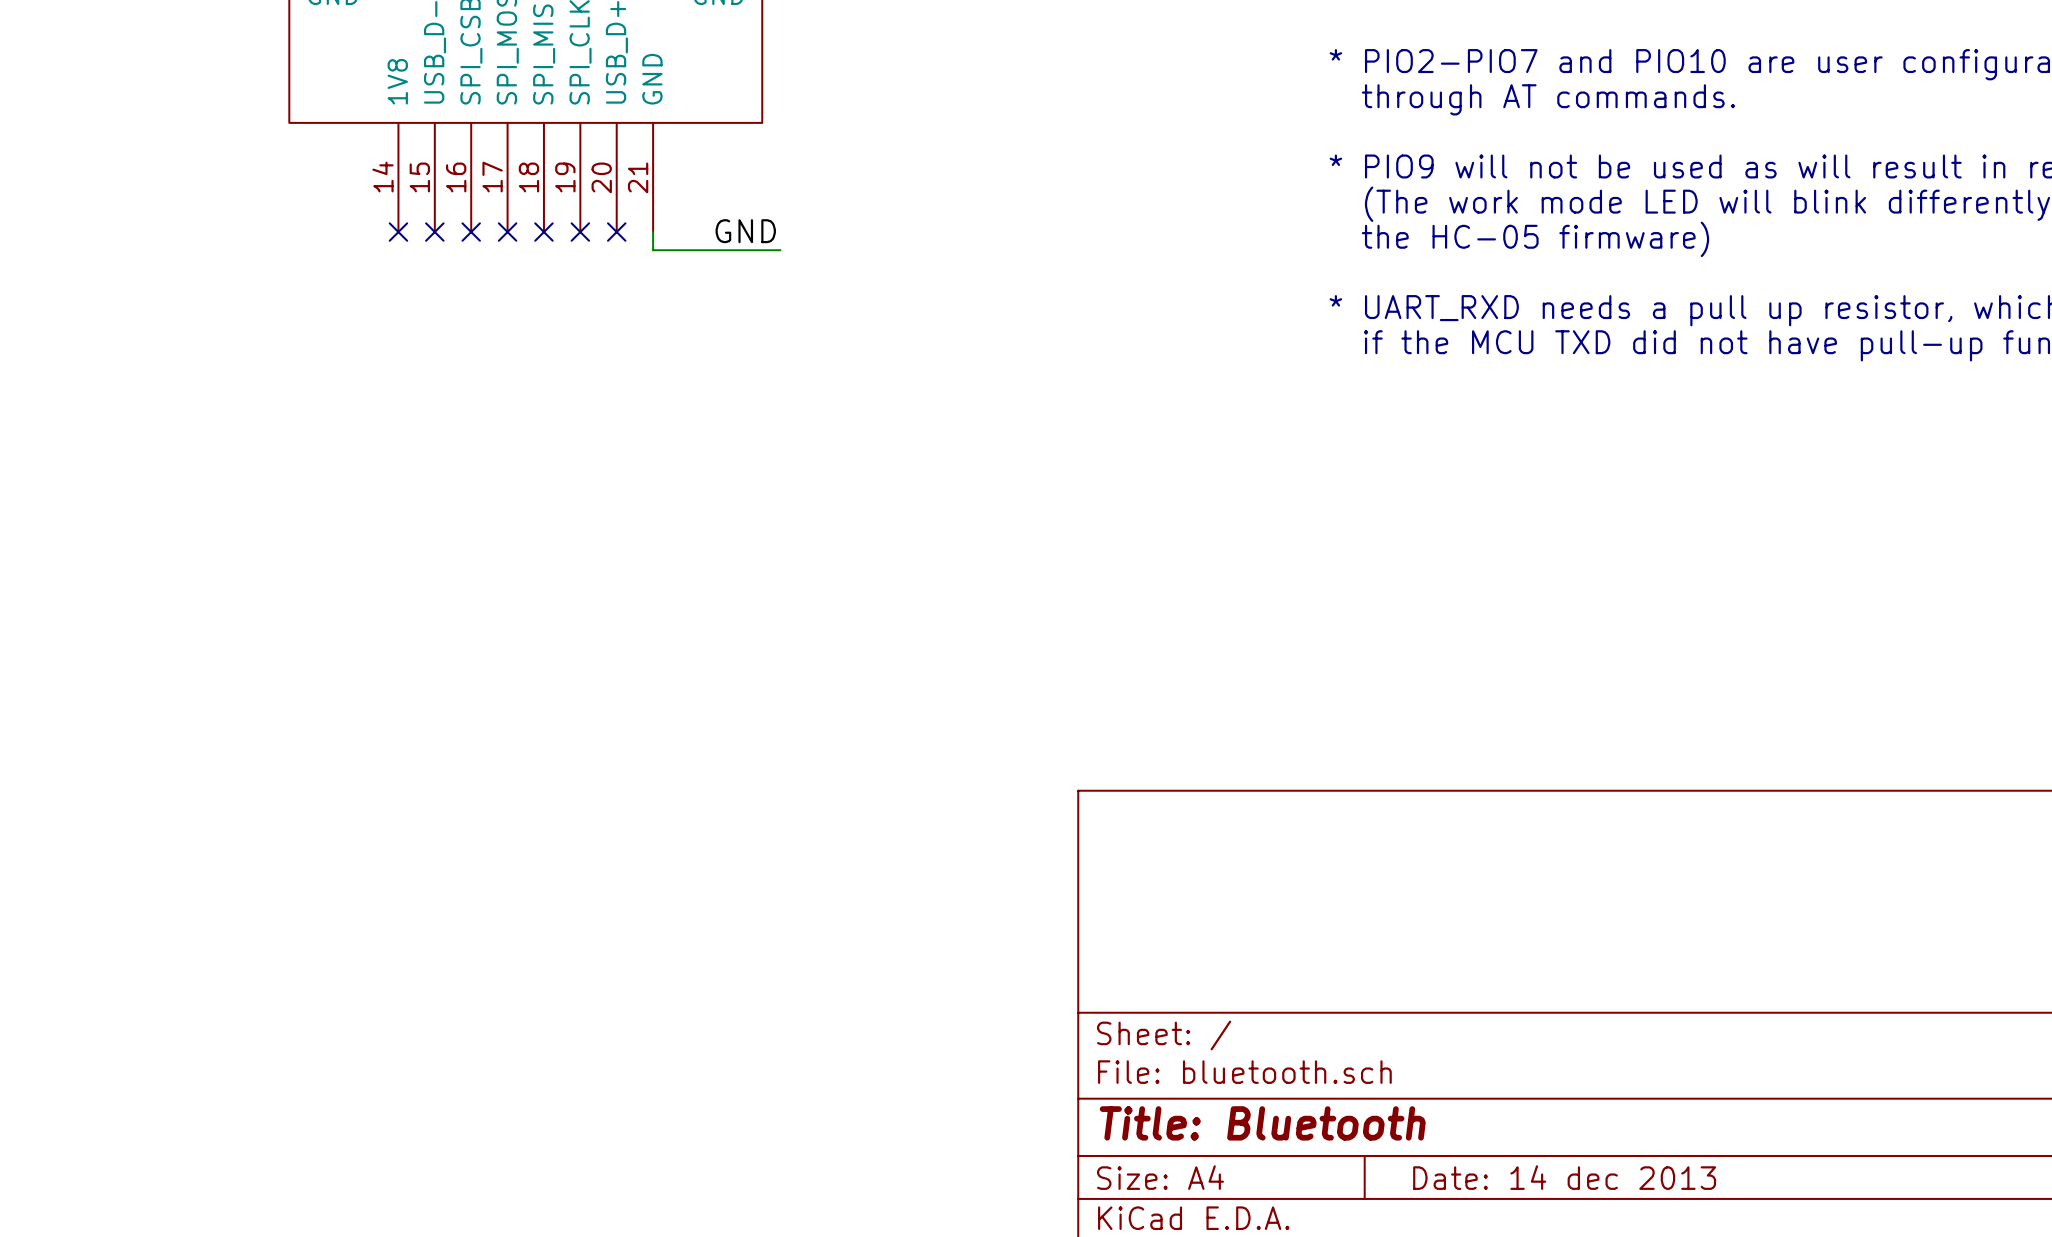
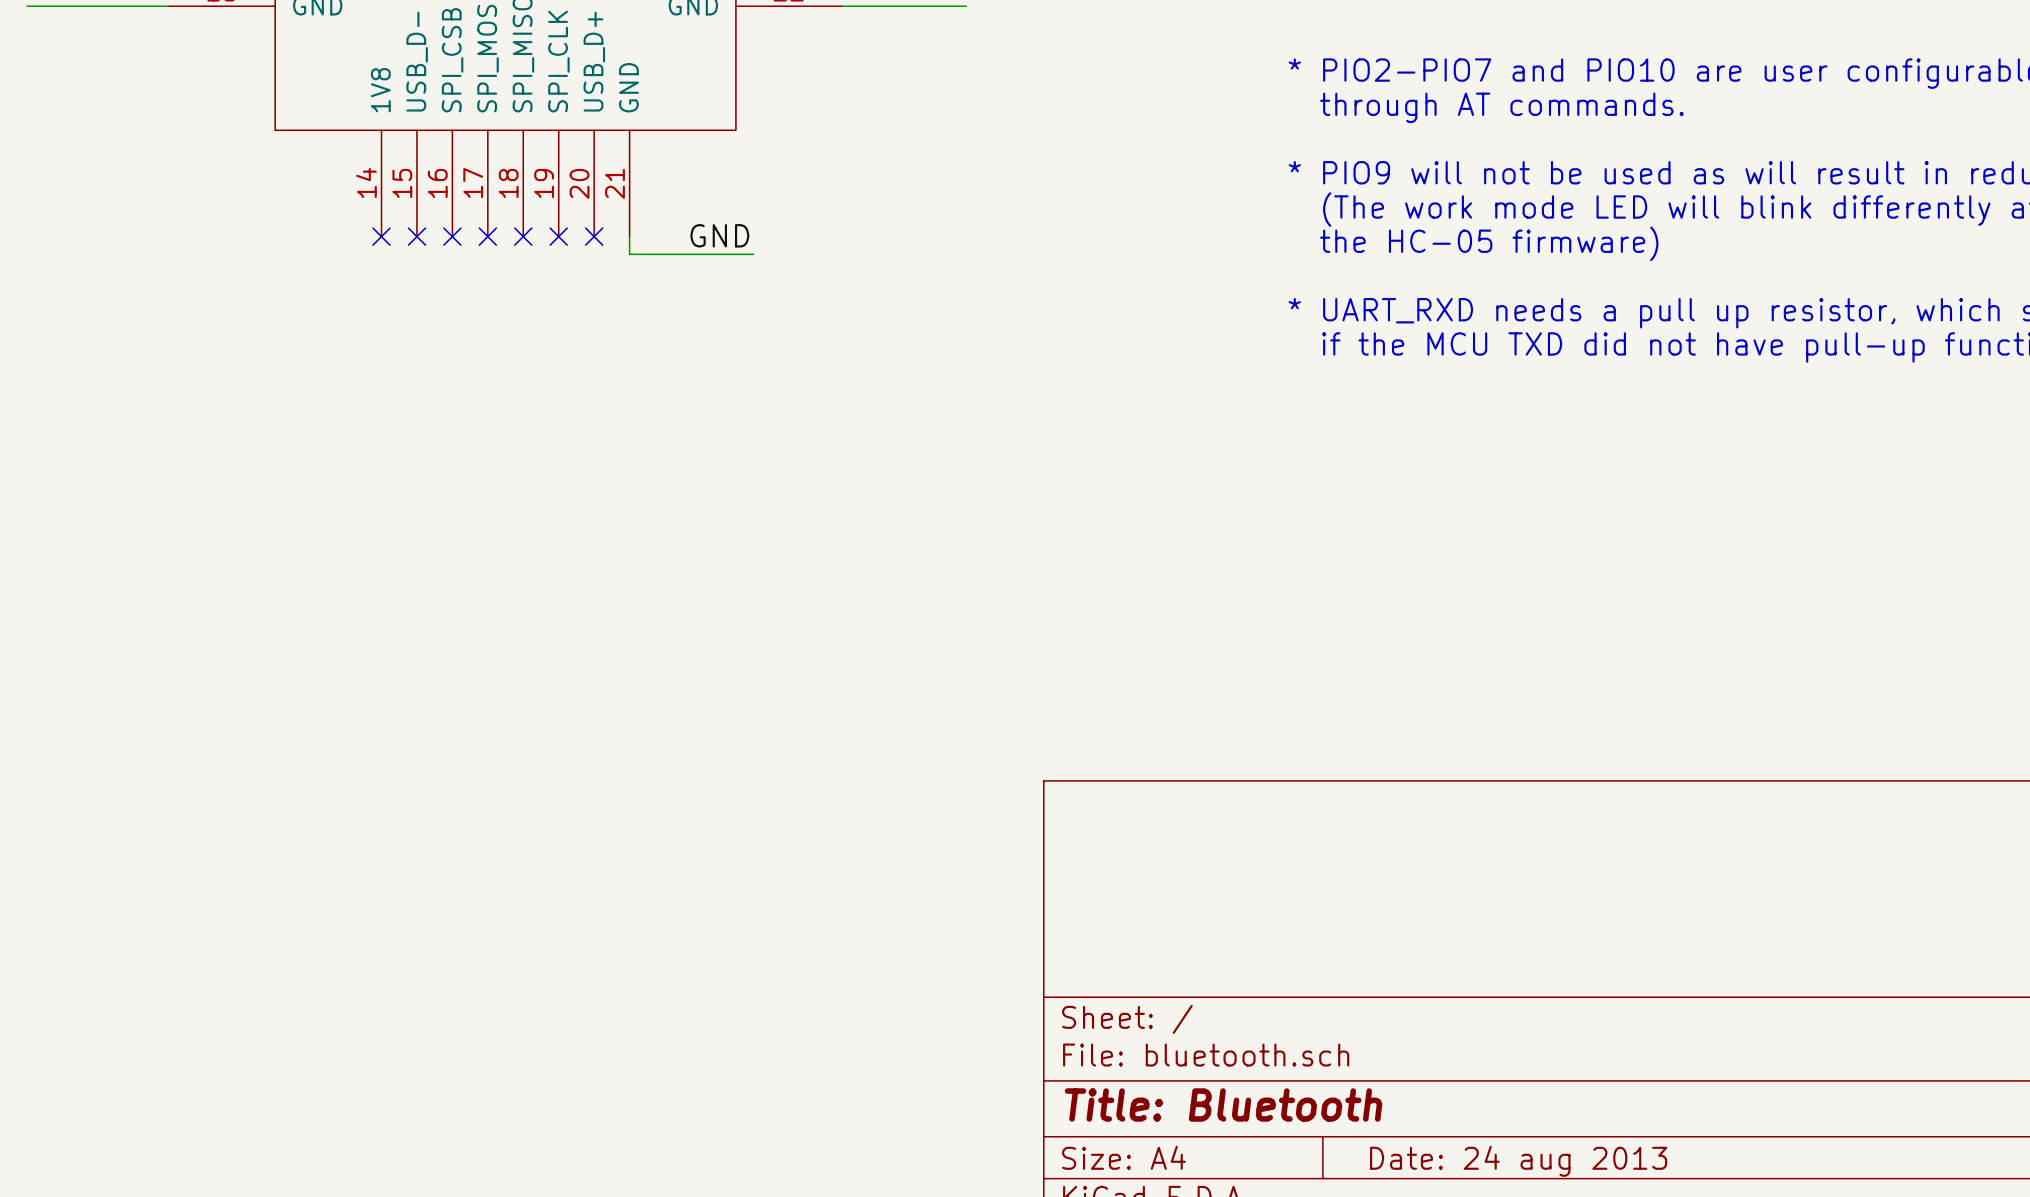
title block: Date: 14 dec 2013 (1564, 1177) -> Date: 24 aug 2013 (1518, 1161)

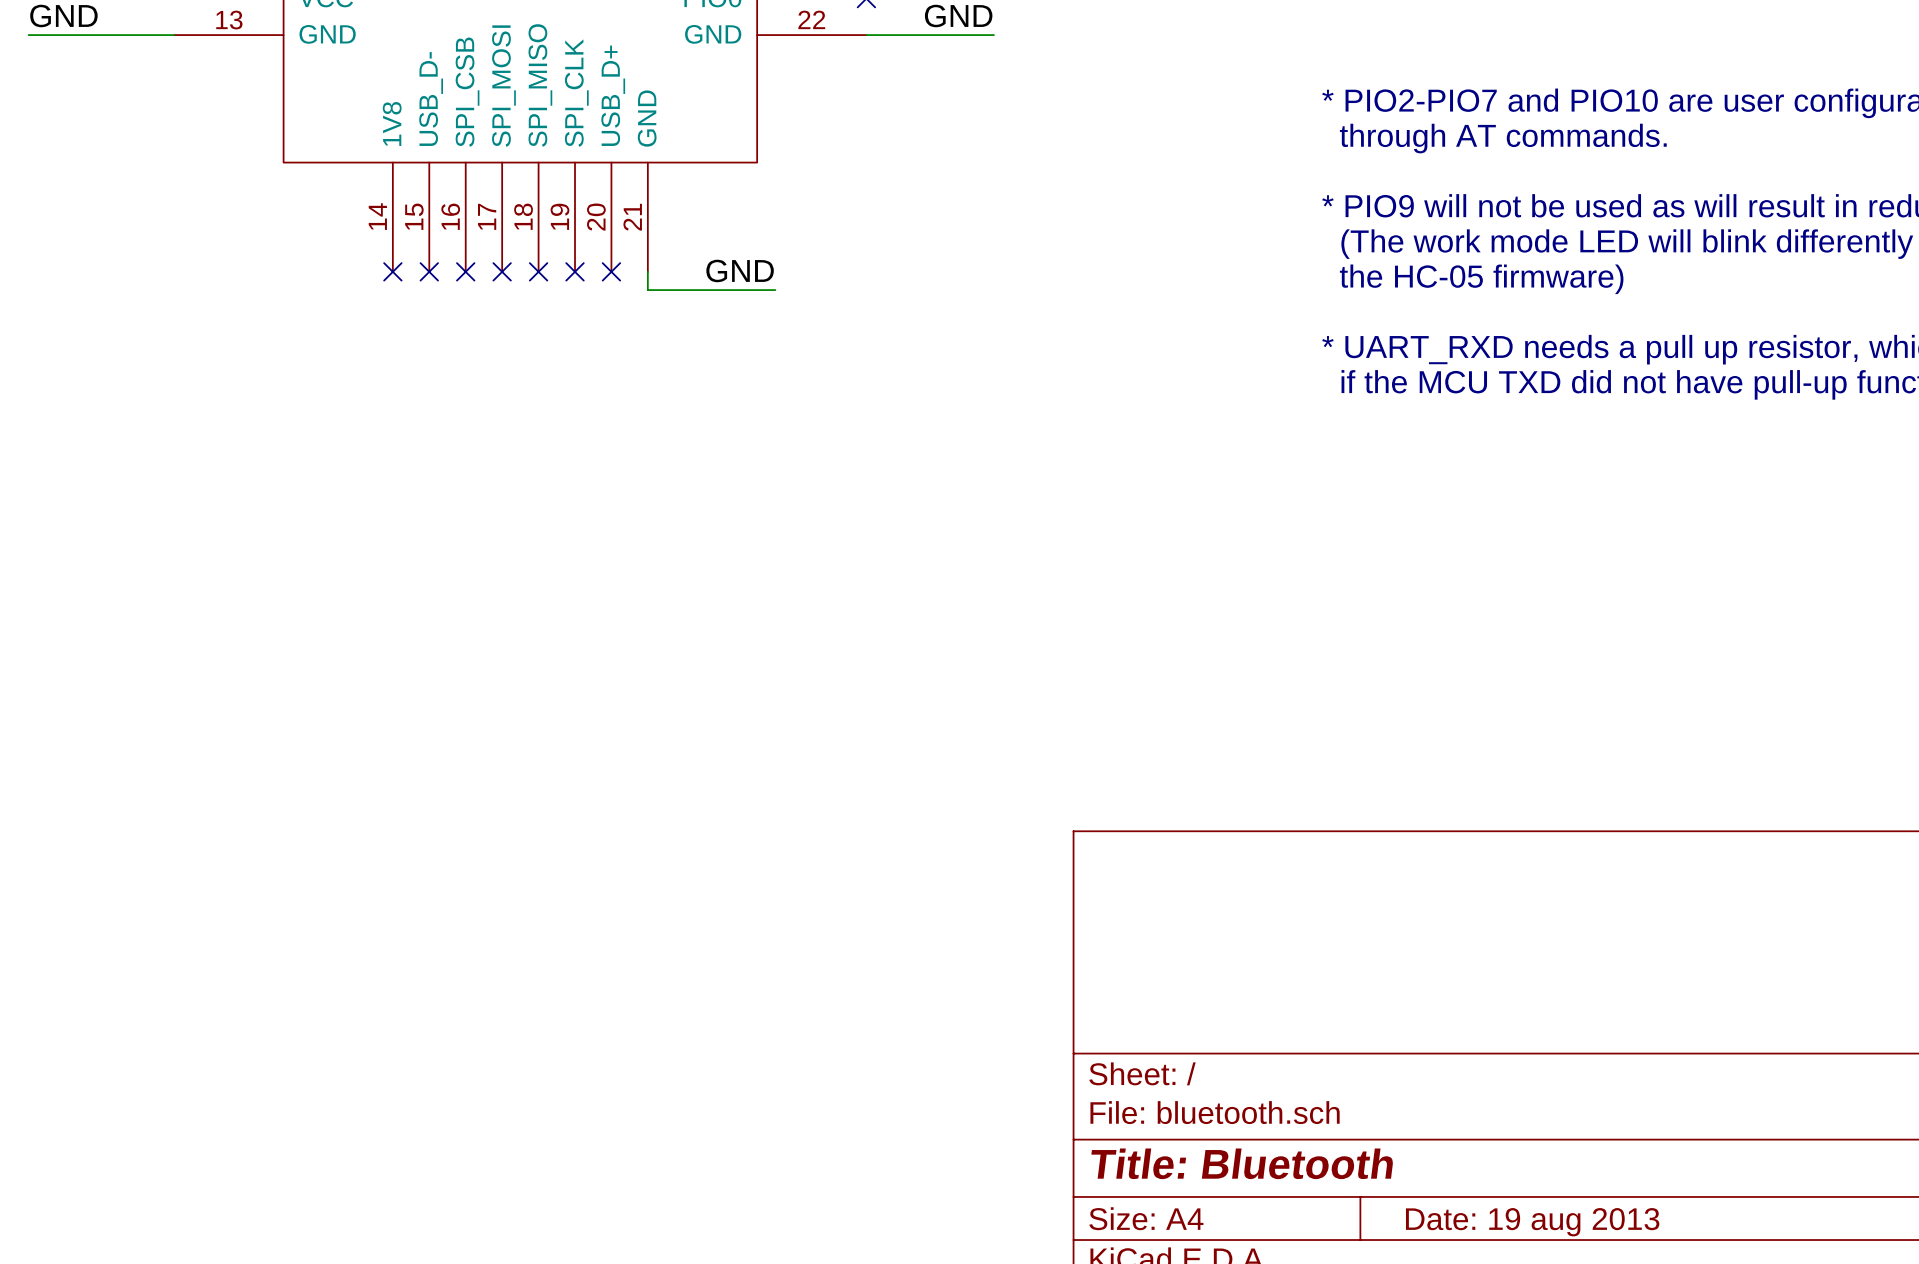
title block: Date: 24 aug 2013 (1518, 1161) -> Date: 19 aug 2013 (1532, 1222)

